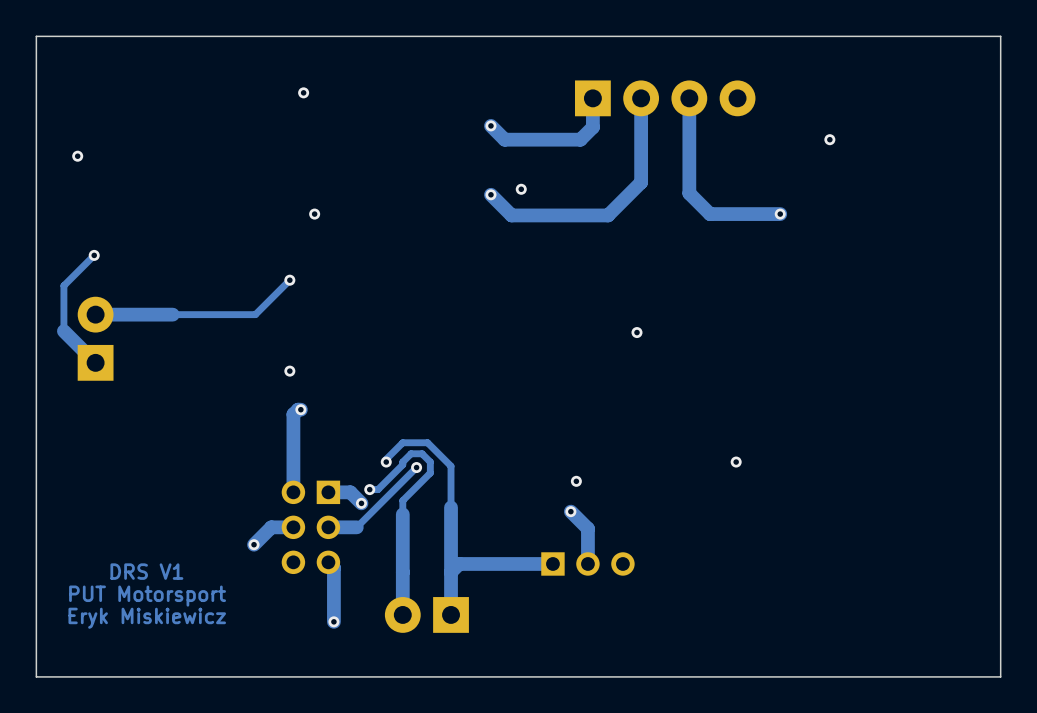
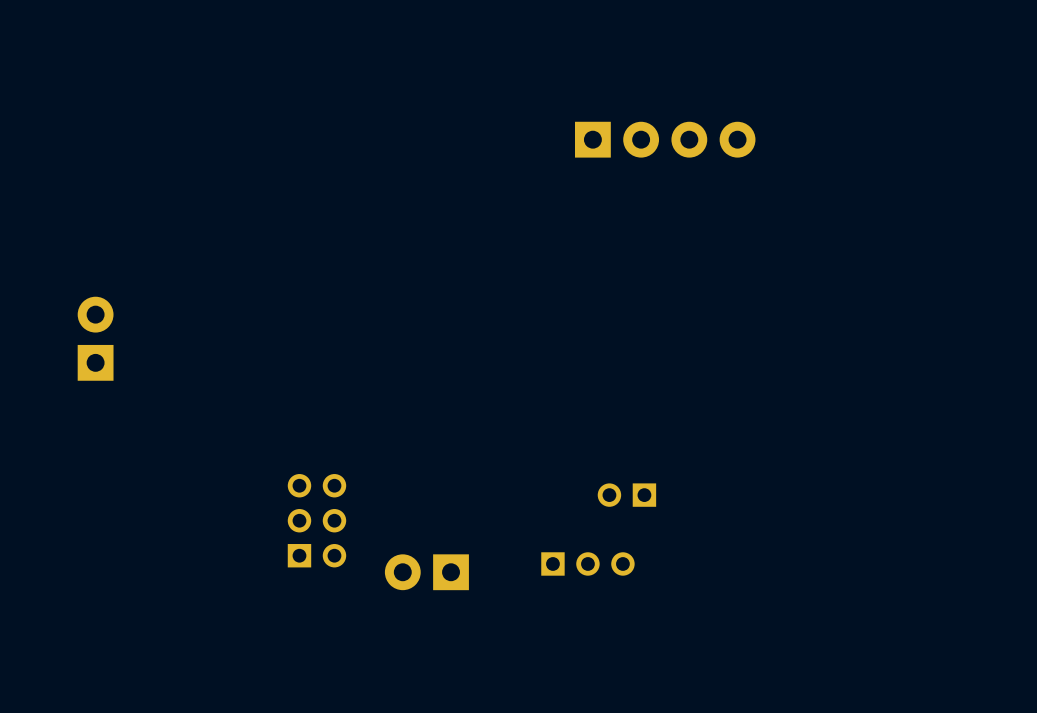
board edge: (1000, 36) (1000, 676) (36, 676) (36, 36) (1000, 36) -> none
via: (303, 92) -> none
track: (592, 98) (592, 127) (580, 139) (504, 139) (490, 125) -> none
track: (641, 98) (641, 182) (608, 215) (511, 215) (490, 194) -> none
part position: (665, 98) -> (665, 139)
track: (689, 98) (689, 193) (710, 214) (780, 214) -> none
via: (490, 125) -> none
via: (829, 139) -> none
via: (77, 156) -> none
via: (521, 189) -> none
via: (490, 194) -> none
via: (314, 214) -> none
via: (780, 214) -> none
track: (94, 255) (63, 285) (63, 331) (95, 362) -> none
via: (94, 255) -> none
track: (289, 280) (255, 314) (95, 314) -> none
via: (289, 280) -> none
via: (636, 332) -> none
via: (289, 371) -> none
track: (300, 409) (293, 414) (293, 492) -> none
via: (300, 409) -> none
track: (386, 462) (386, 459) (402, 442) (427, 442) (451, 466) (451, 614) -> none
via: (386, 462) -> none
via: (736, 462) -> none
track: (416, 467) (356, 527) (328, 527) -> none
via: (416, 467) -> none
via: (576, 481) -> none
track: (369, 489) (378, 489) (411, 453) (422, 453) (430, 462) (430, 473) (402, 500) (402, 614) -> none
via: (369, 489) -> none
track: (328, 492) (350, 492) (361, 503) -> none
part: none -> (626, 495)
via: (361, 503) -> none
track: (570, 511) (587, 528) (587, 563) -> none
via: (570, 511) -> none
track: (293, 527) (271, 527) (254, 544) -> none
part rotation: 0° (310, 527) -> 180° (316, 520)
via: (254, 544) -> none
track: (328, 562) (333, 567) (333, 621) -> none
track: (552, 563) (459, 563) (451, 572) -> none
text: DRS V1 (146, 571) -> none
text: PUT Motorsport (147, 596) -> none
part position: (426, 614) -> (426, 572)
text: Eryk Miskiewicz (147, 618) -> none
via: (333, 621) -> none

